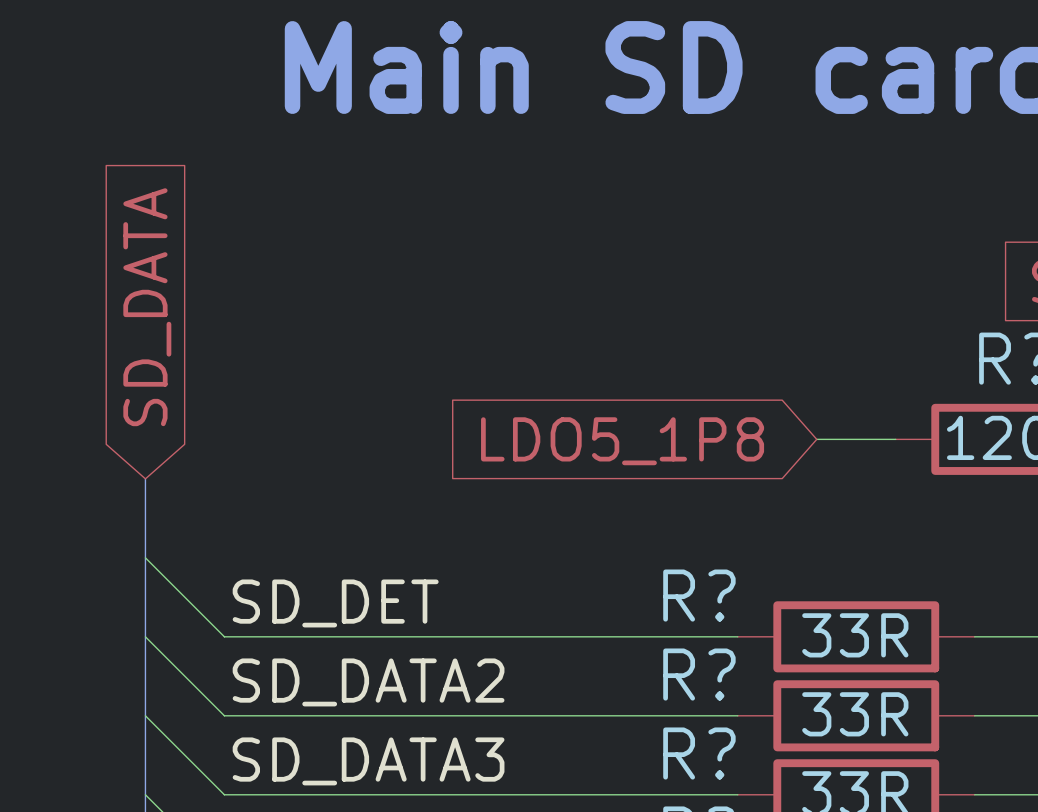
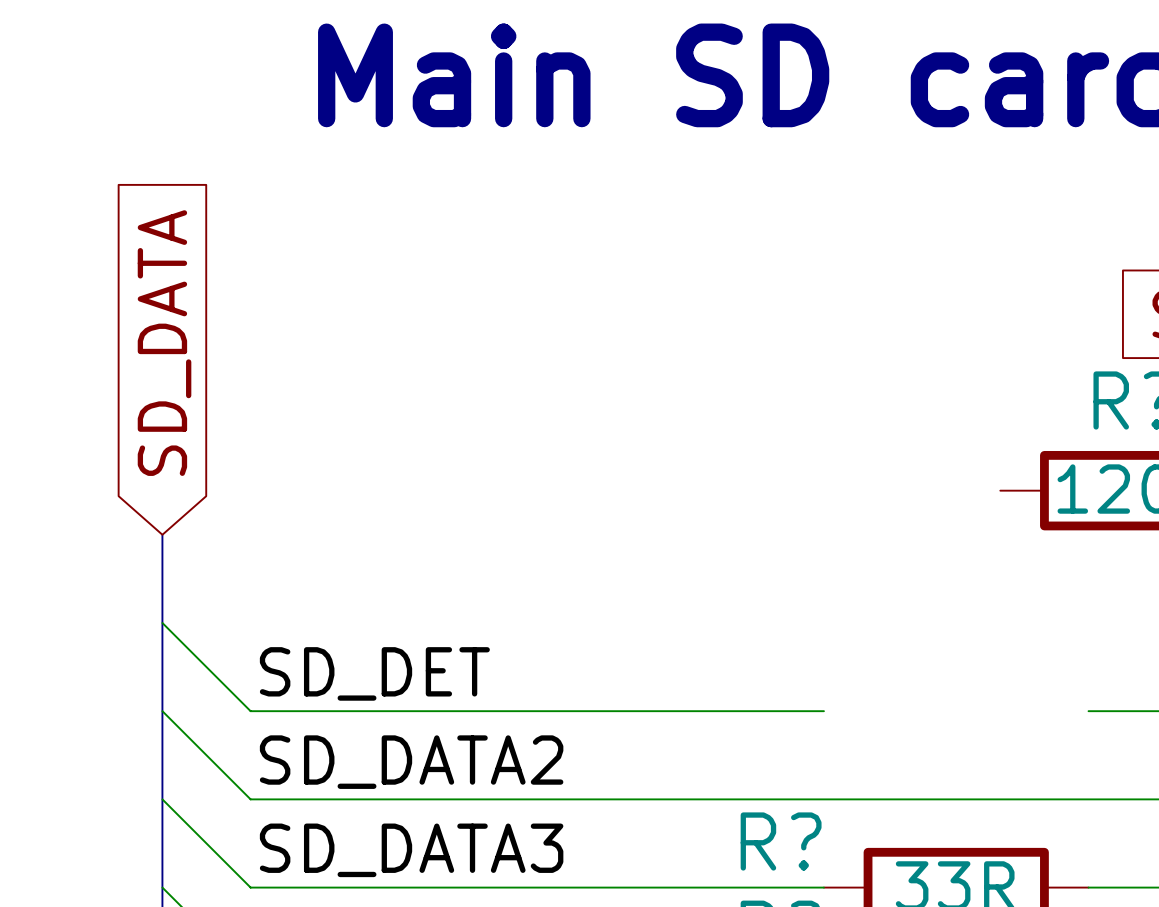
wire: (816, 439) (895, 439) -> none
global label: LDO5_1P8 (622, 441) -> none
R?: (856, 636) -> none
wire: none -> (823, 799) (1088, 799)
R?: (856, 715) -> none

